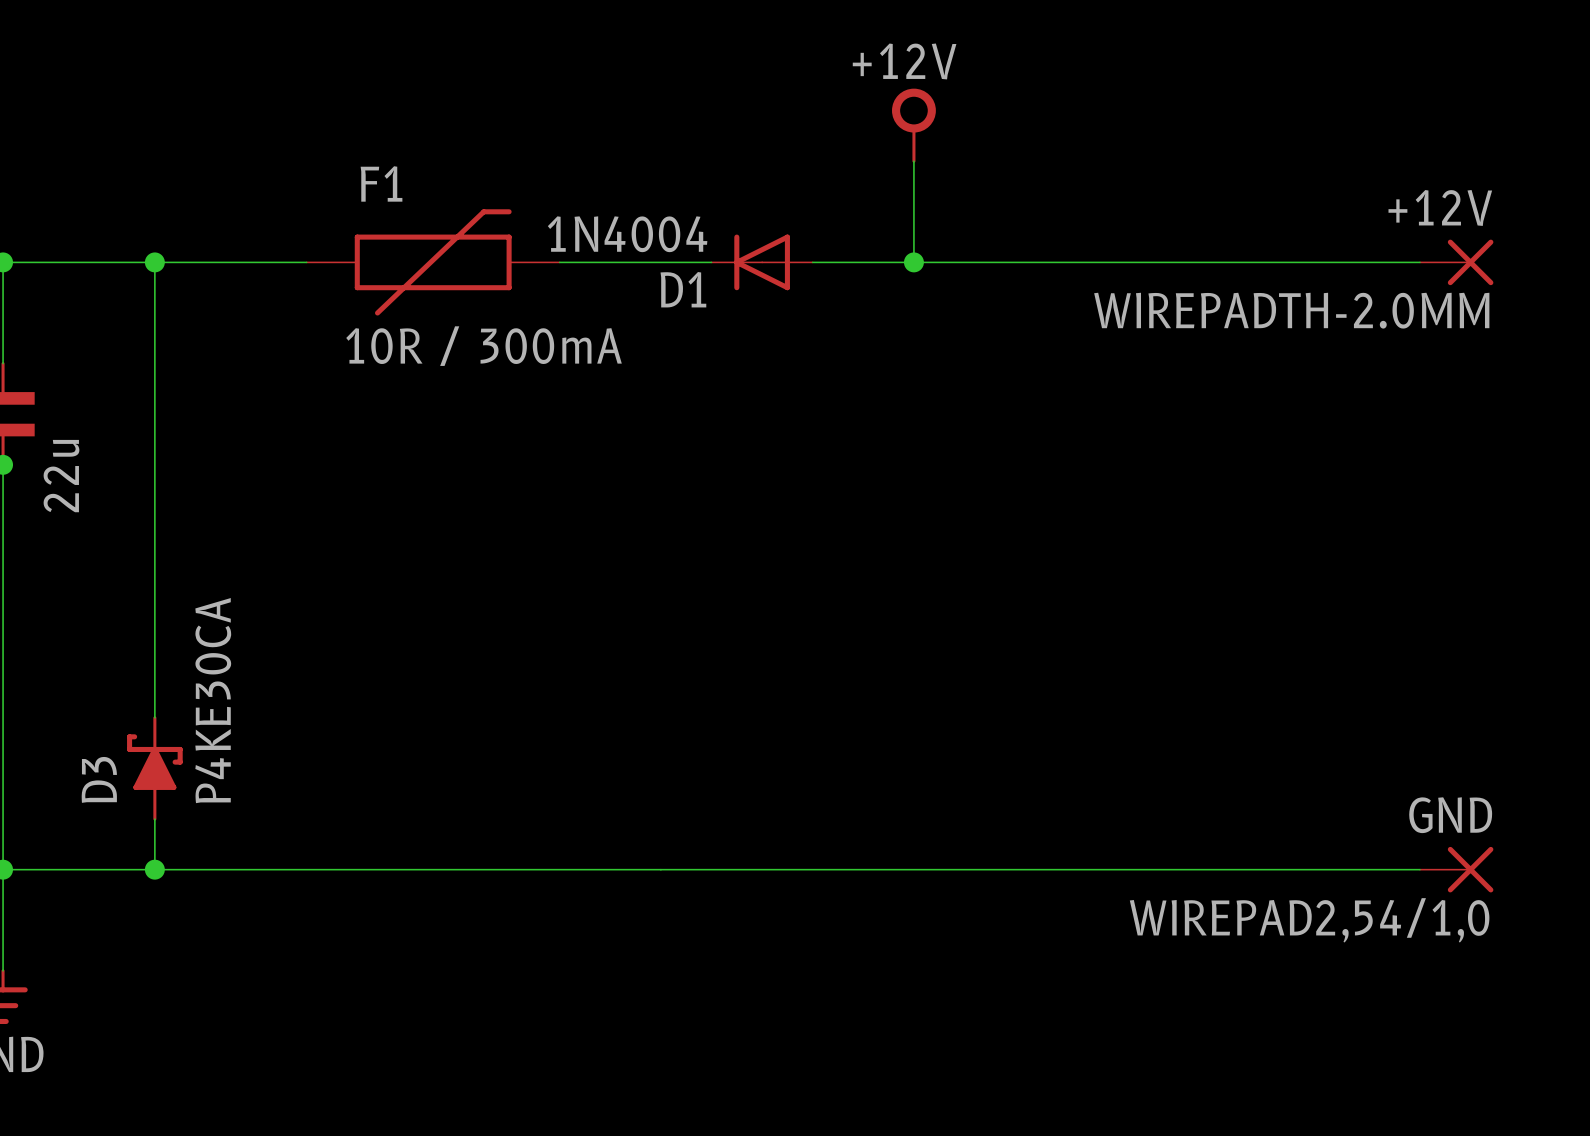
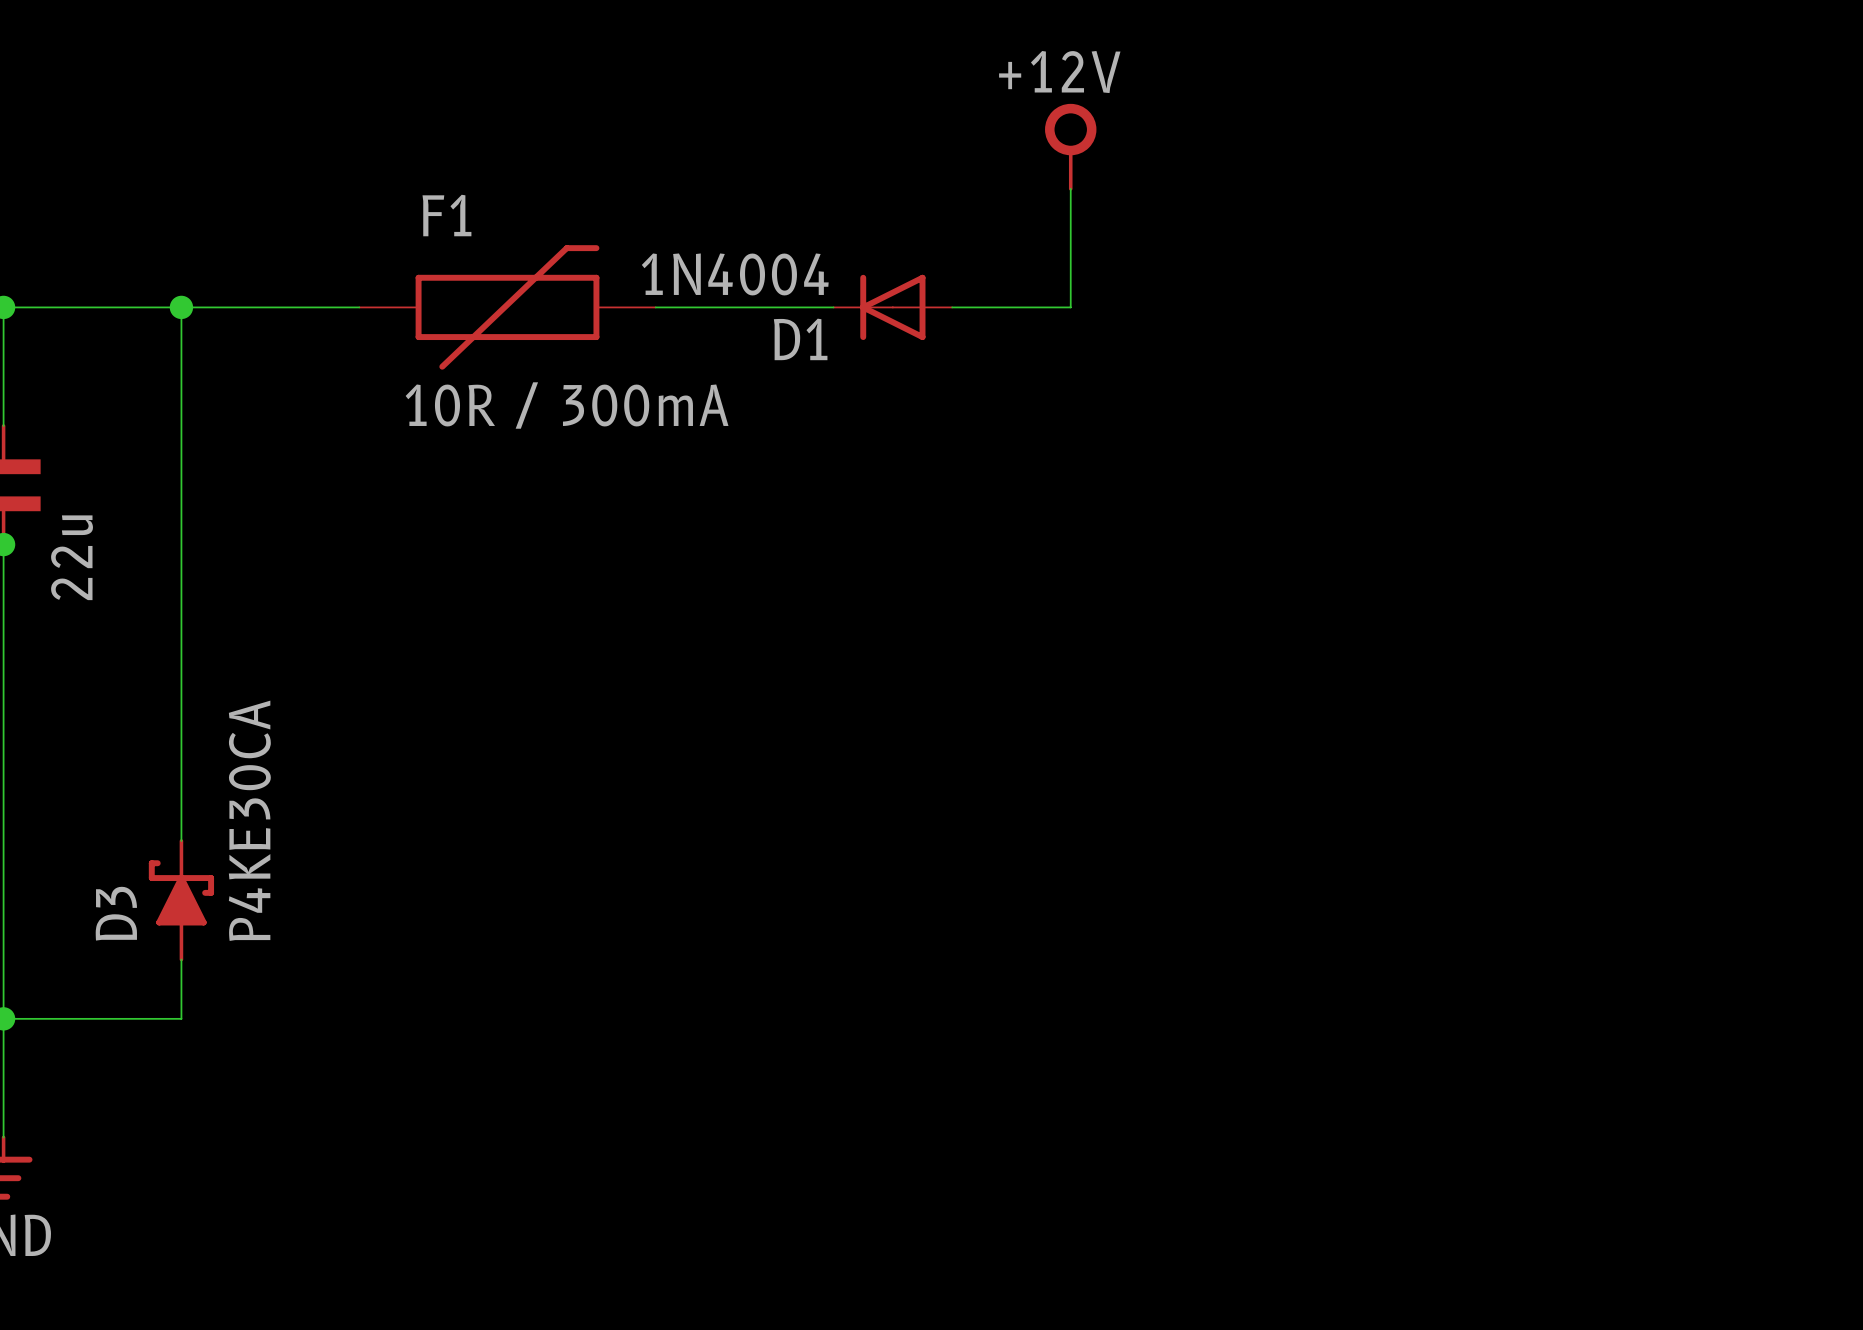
wire: (913, 262) (1419, 262) -> none
junction: (913, 262) -> none
+12V: WIREPADTH-2.0MM (1456, 262) -> none
wire: (154, 869) (1419, 869) -> none
junction: (154, 869) -> none
GND: WIREPAD2,54/1,0 (1456, 869) -> none

